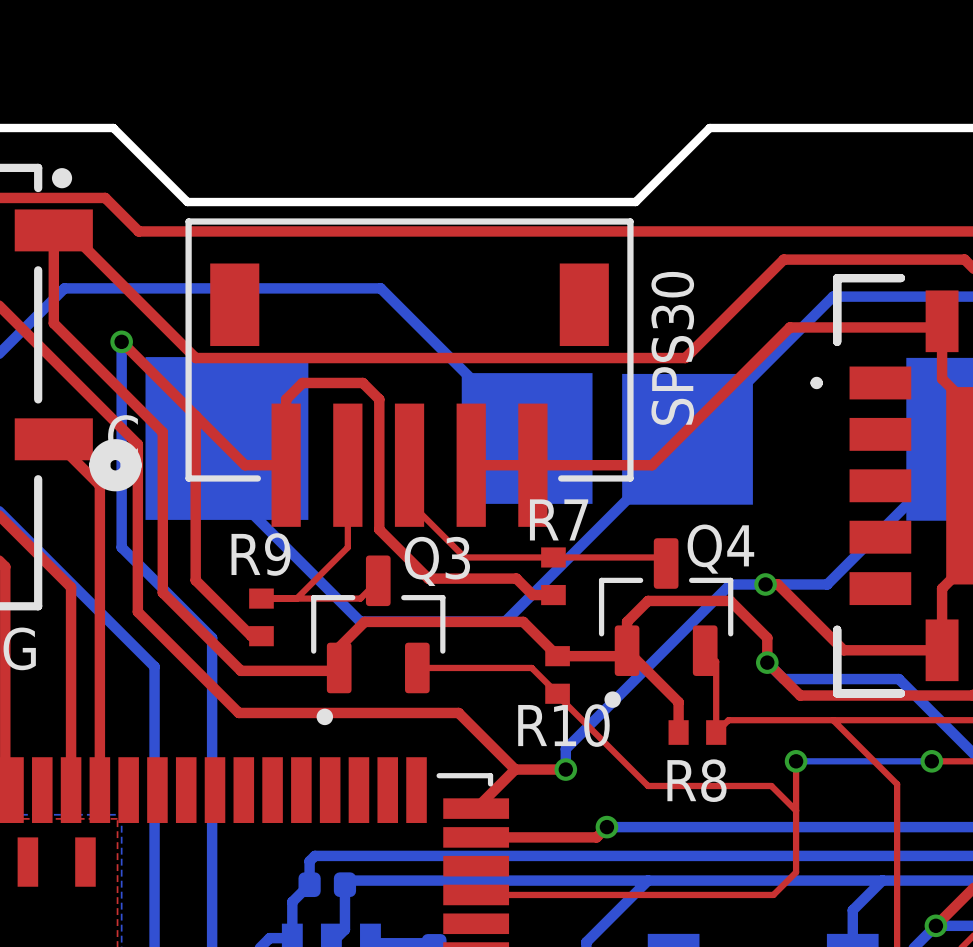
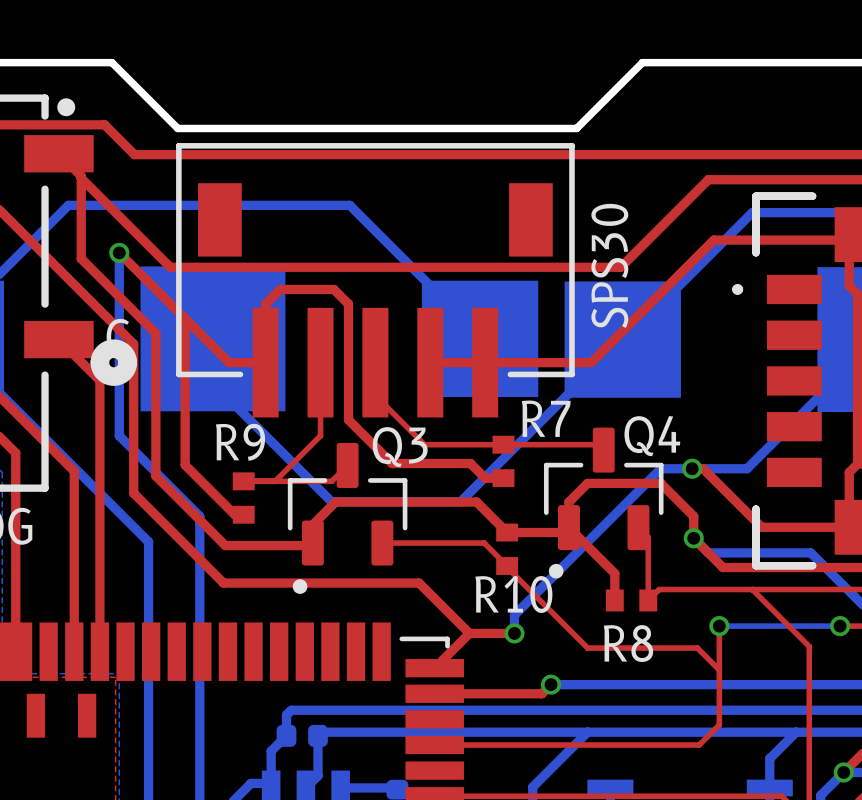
top track: none -> (58, 153) (81, 176) (81, 258)
top track: (78, 348) (53, 323) (53, 230) (68, 230) (195, 358) -> (81, 178) (170, 267) (185, 267)
R7 name position: R7 (559, 519) -> R7 (546, 418)

